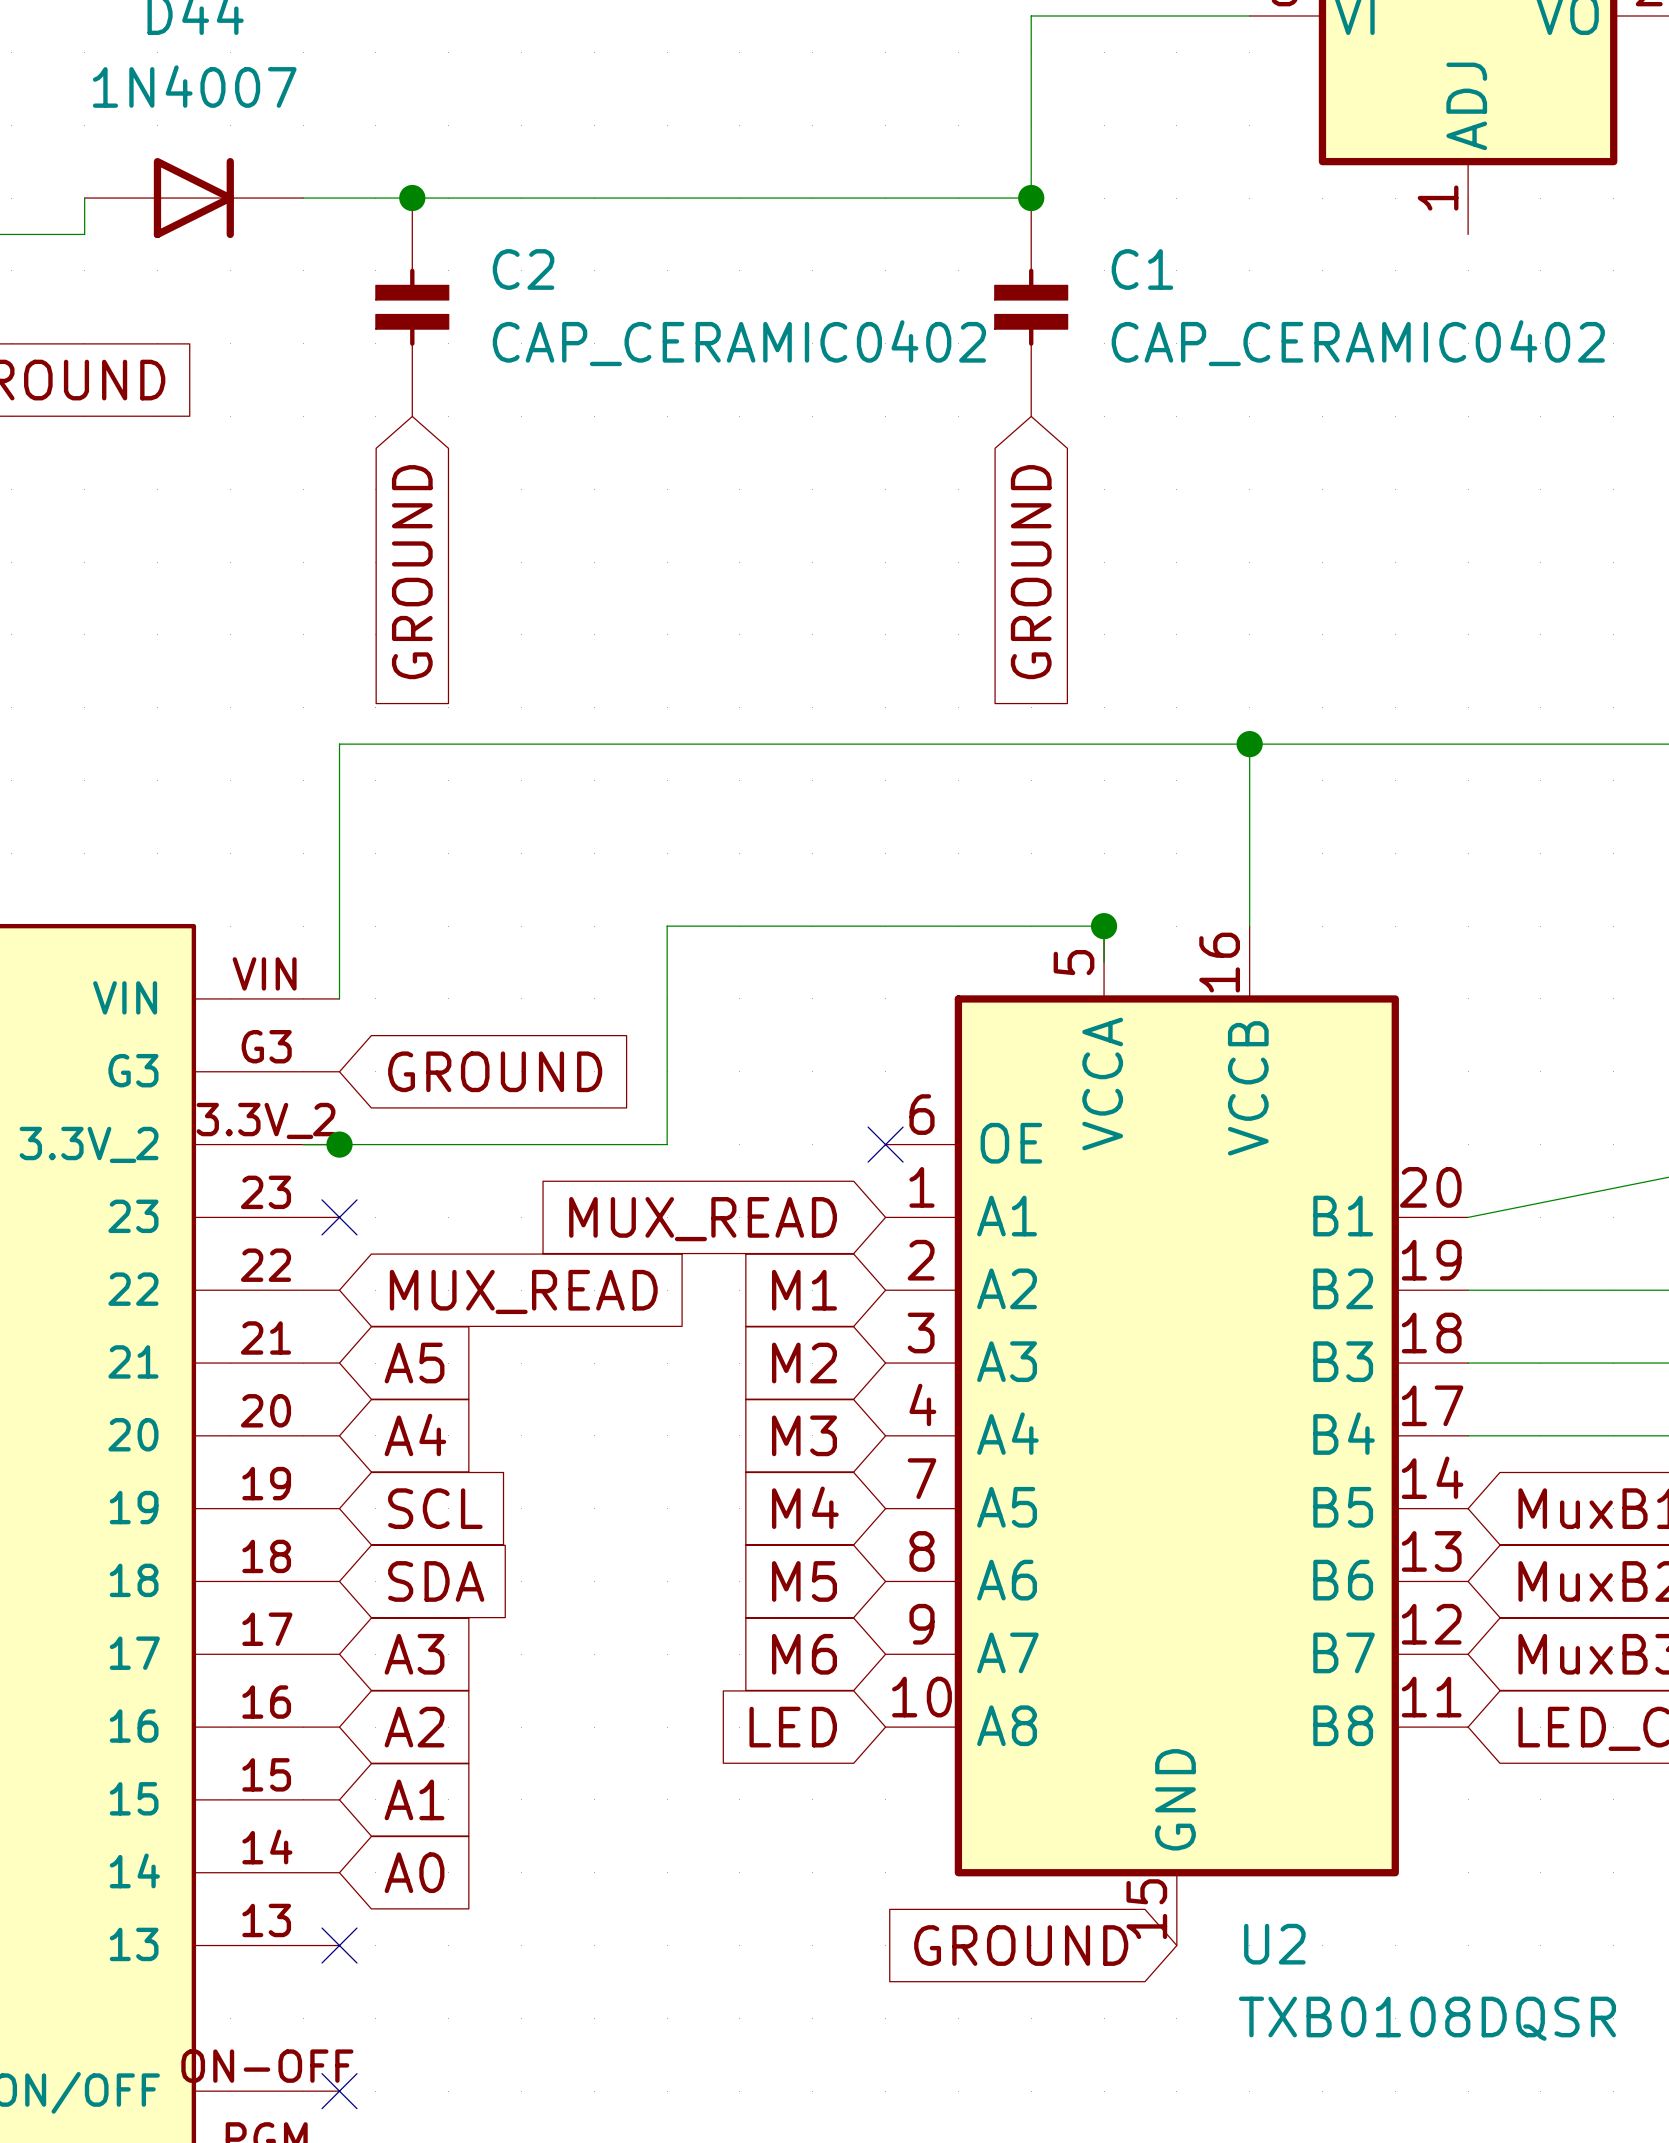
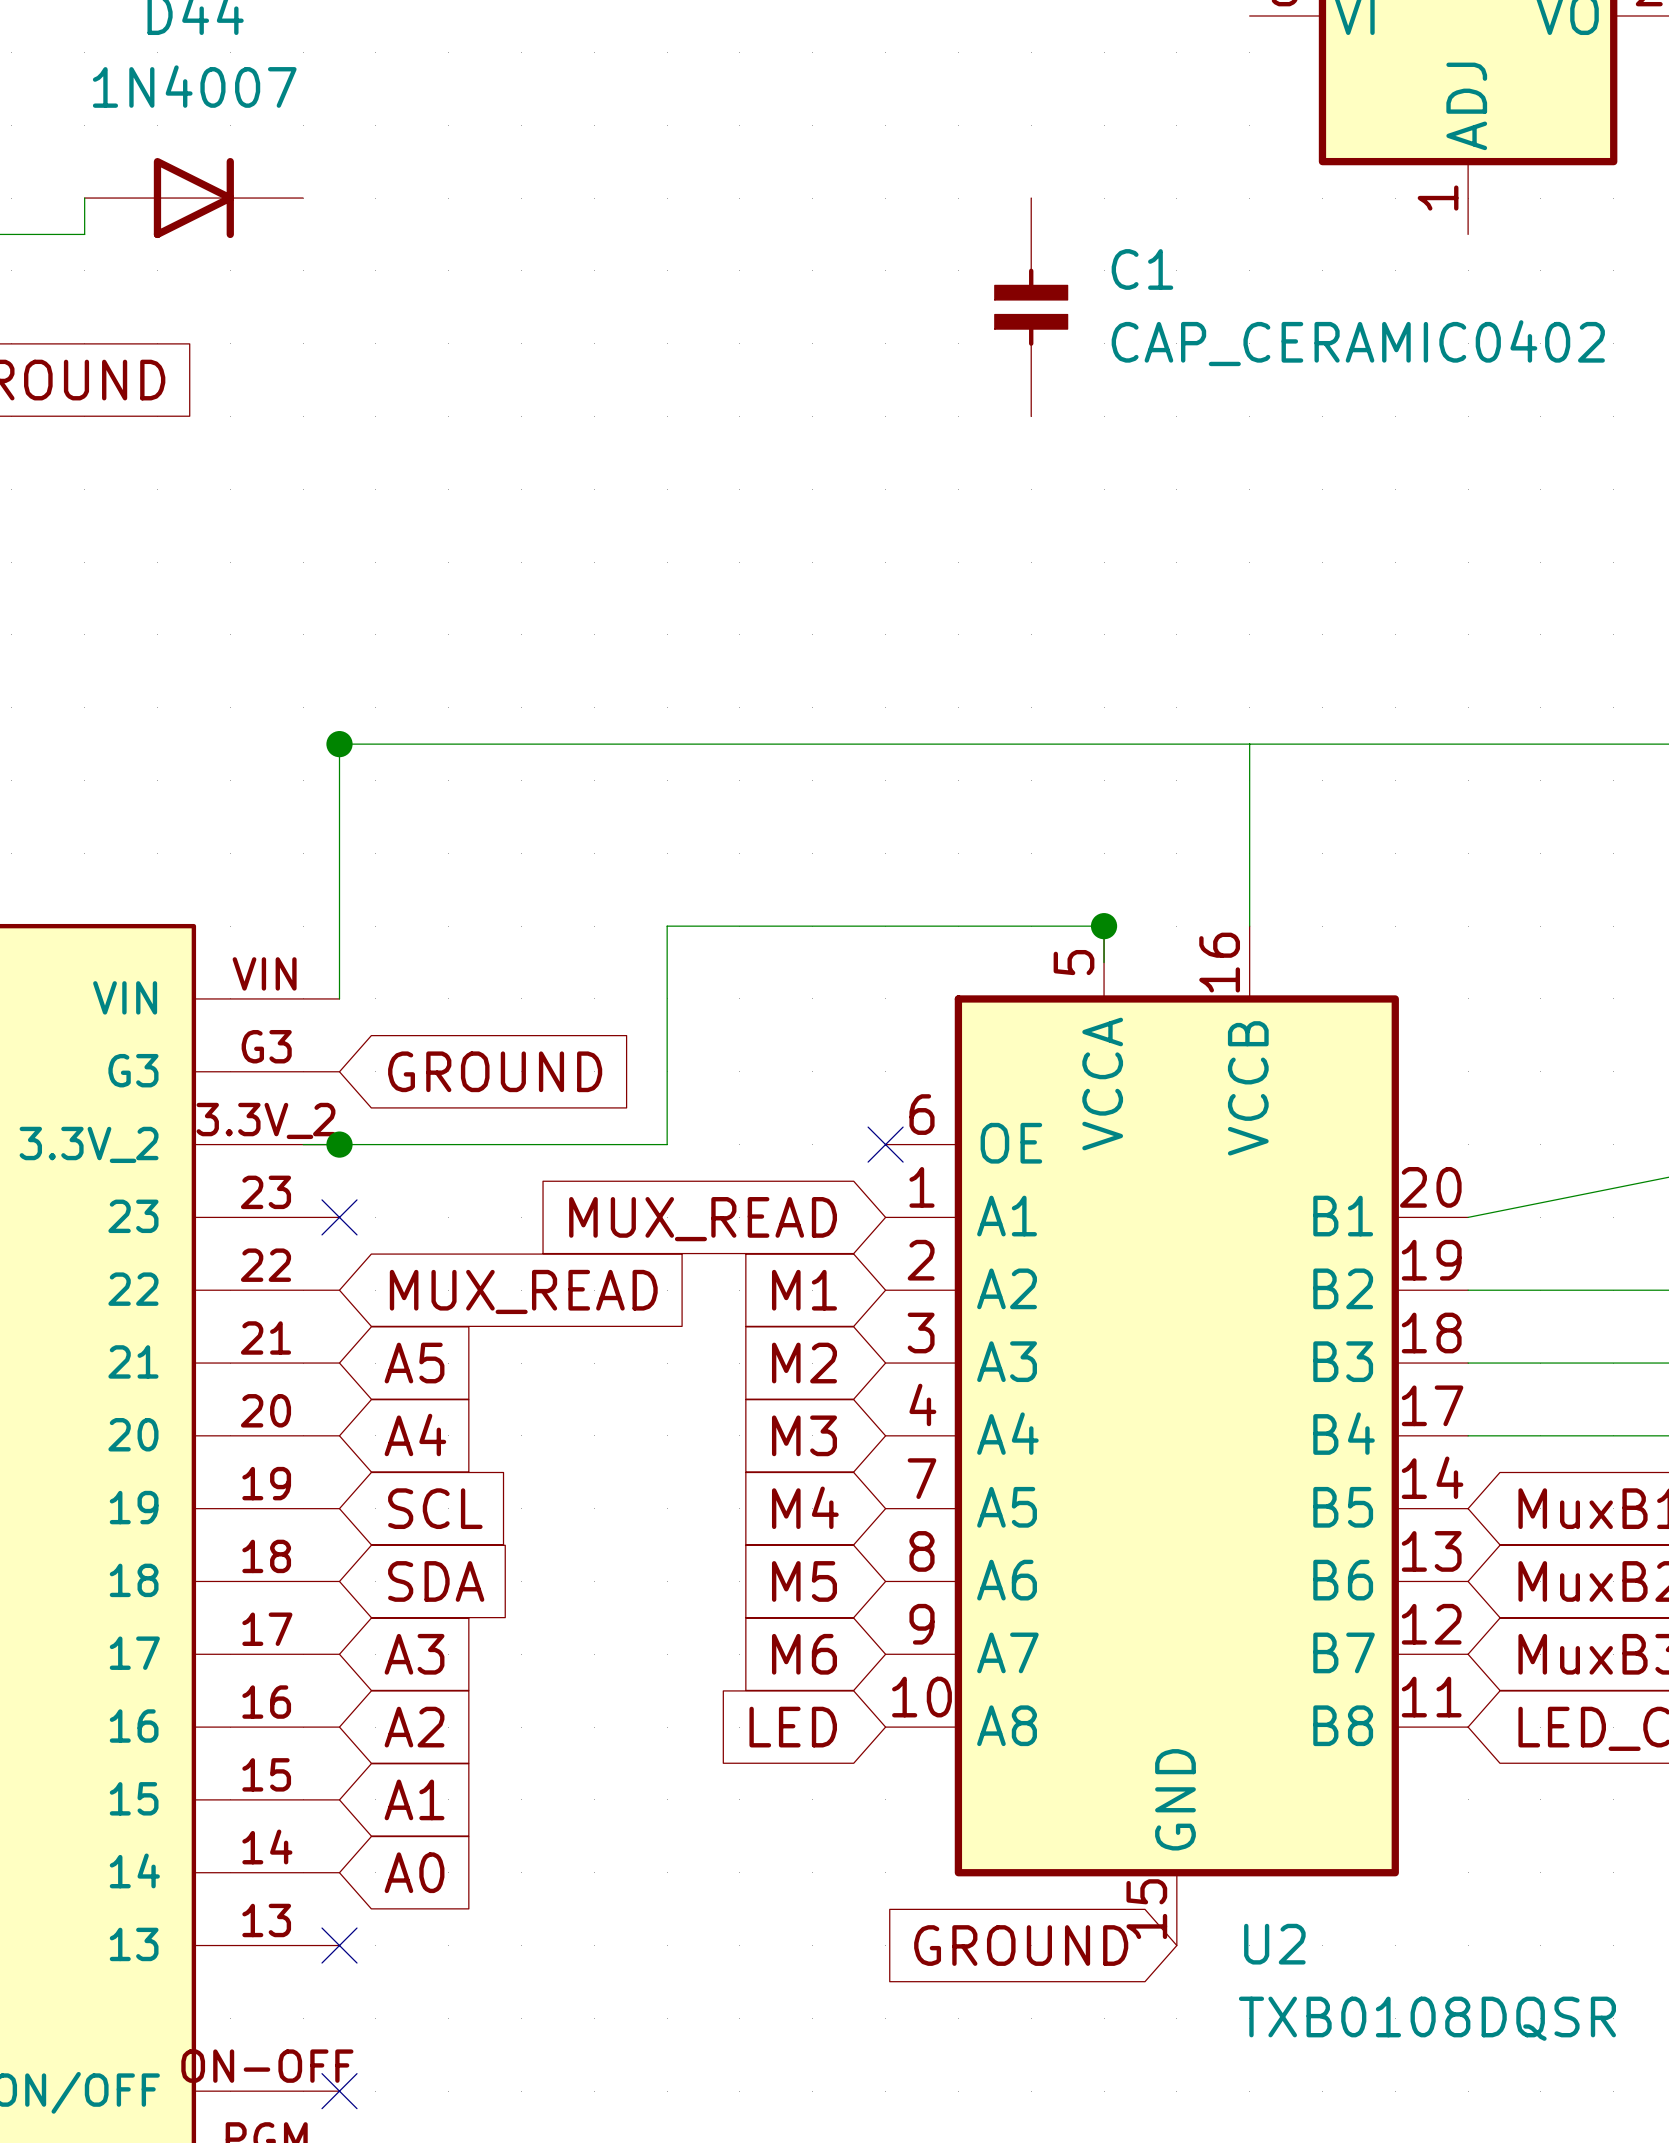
wire: (1249, 15) (1031, 15) (1031, 198) (303, 198) -> none
junction: (412, 198) -> none
junction: (1031, 198) -> none
C2: CAP_CERAMIC0402 (412, 307) -> none
global label: GROUND (412, 572) -> none
global label: GROUND (1031, 572) -> none
junction: none -> (339, 744)
junction: (1249, 744) -> none

